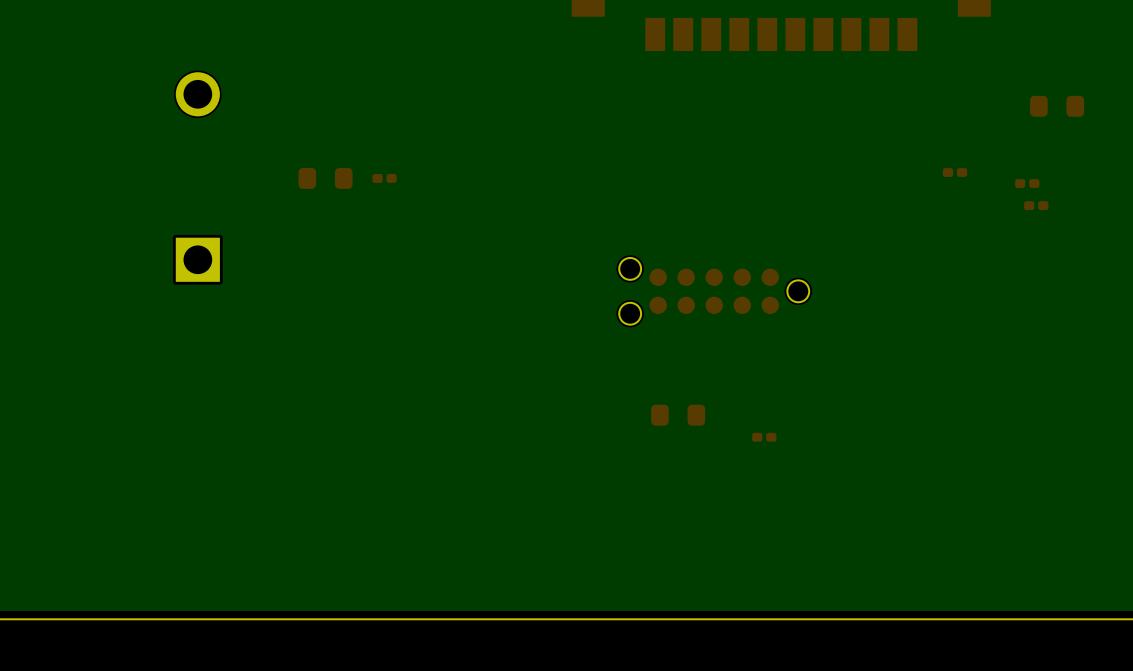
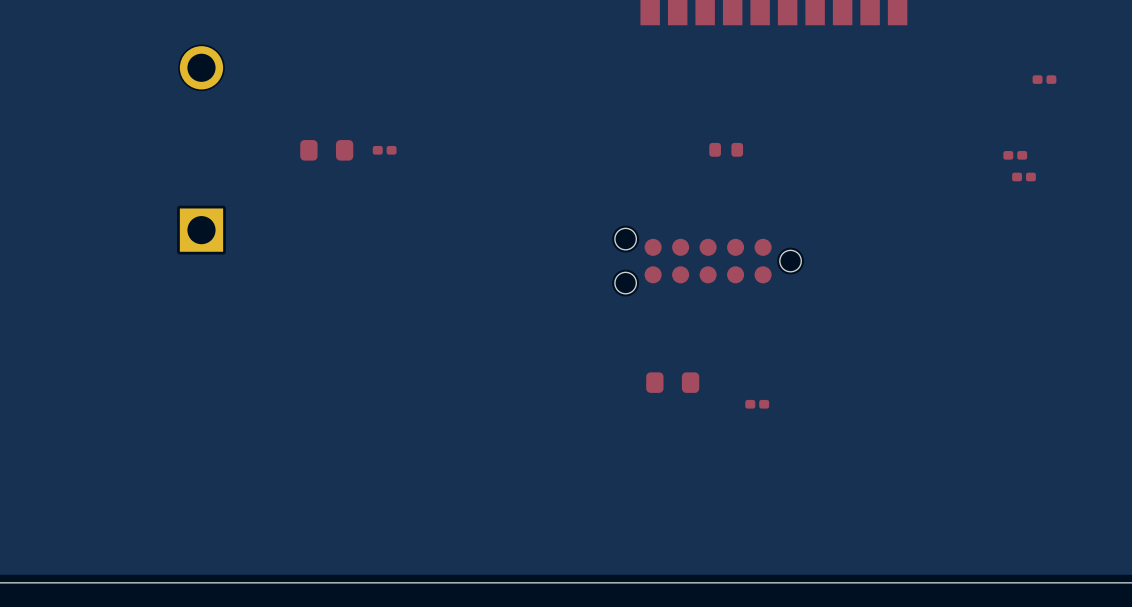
part footprint: [1030, 95, 1085, 117] -> [1032, 75, 1057, 84]
part: (955, 172) -> none
part: none -> (726, 149)

